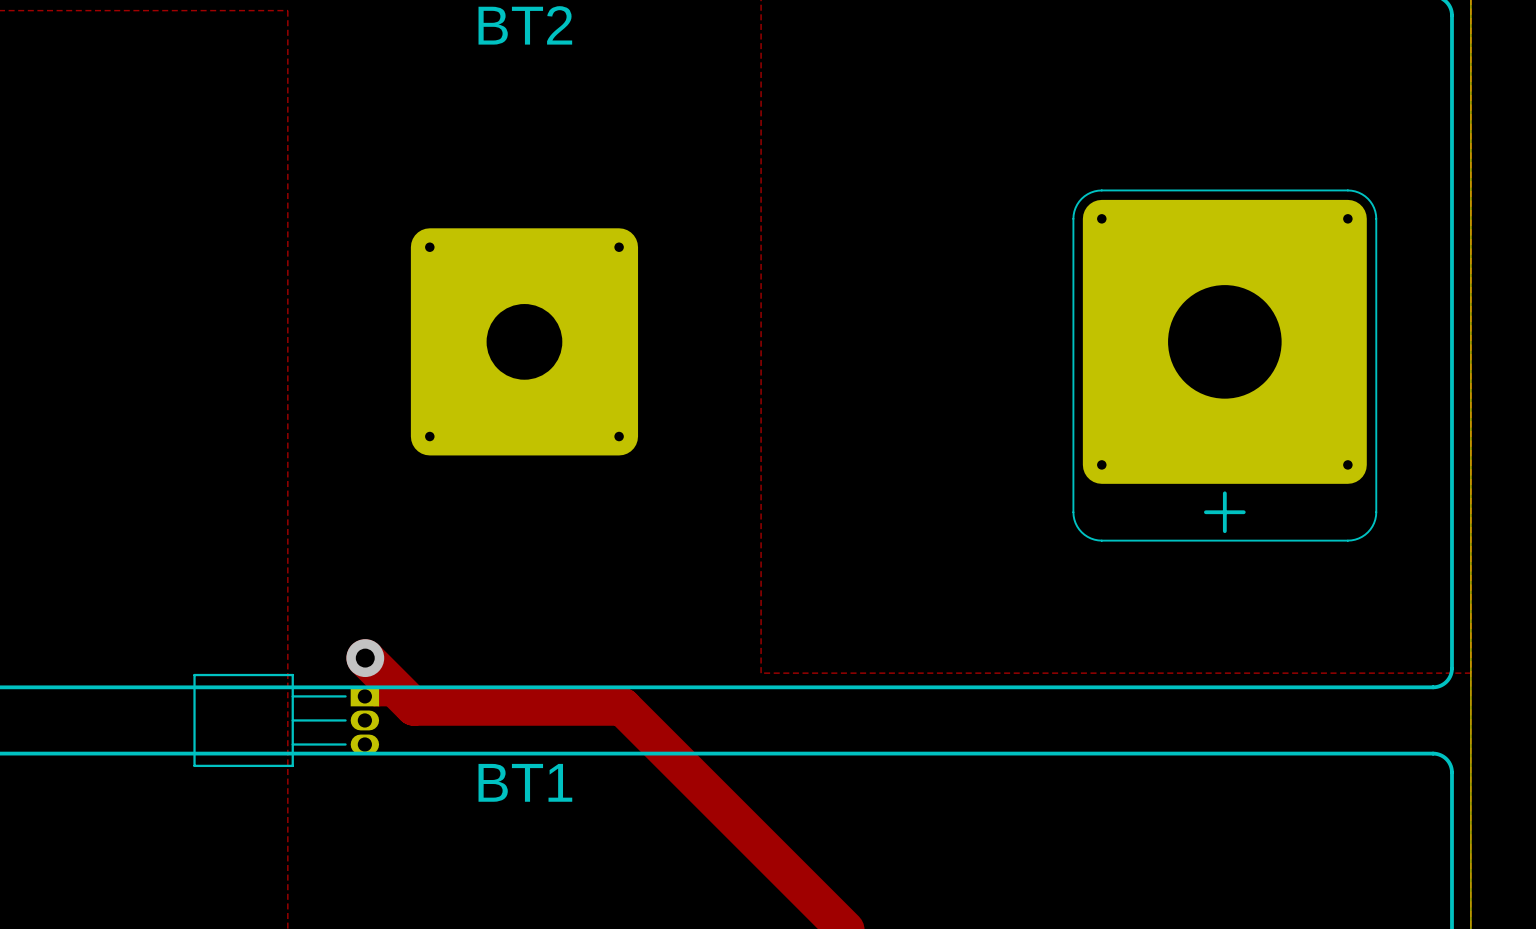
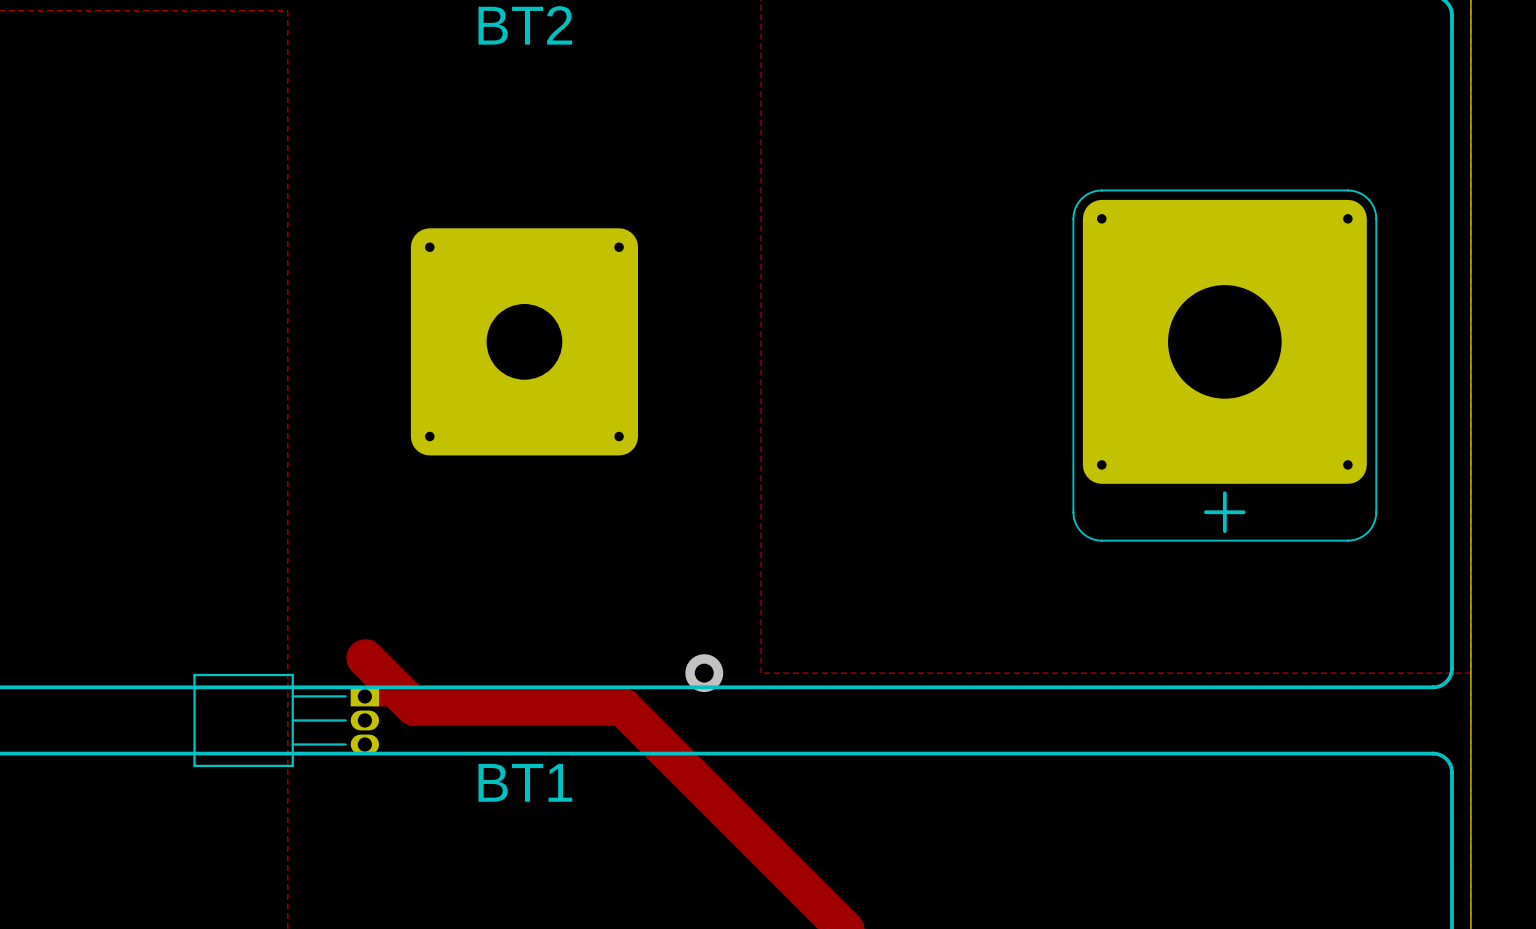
via: (365, 658) -> none
via: none -> (704, 673)

